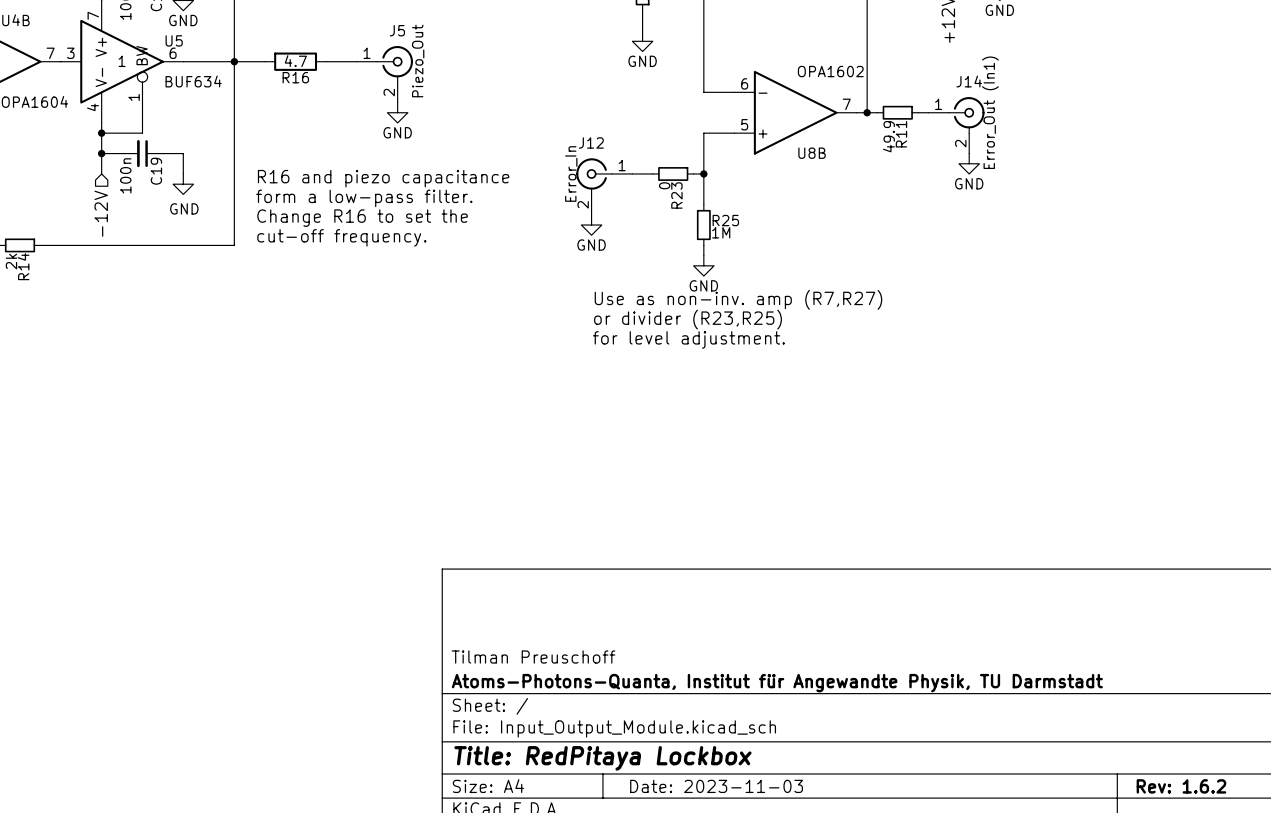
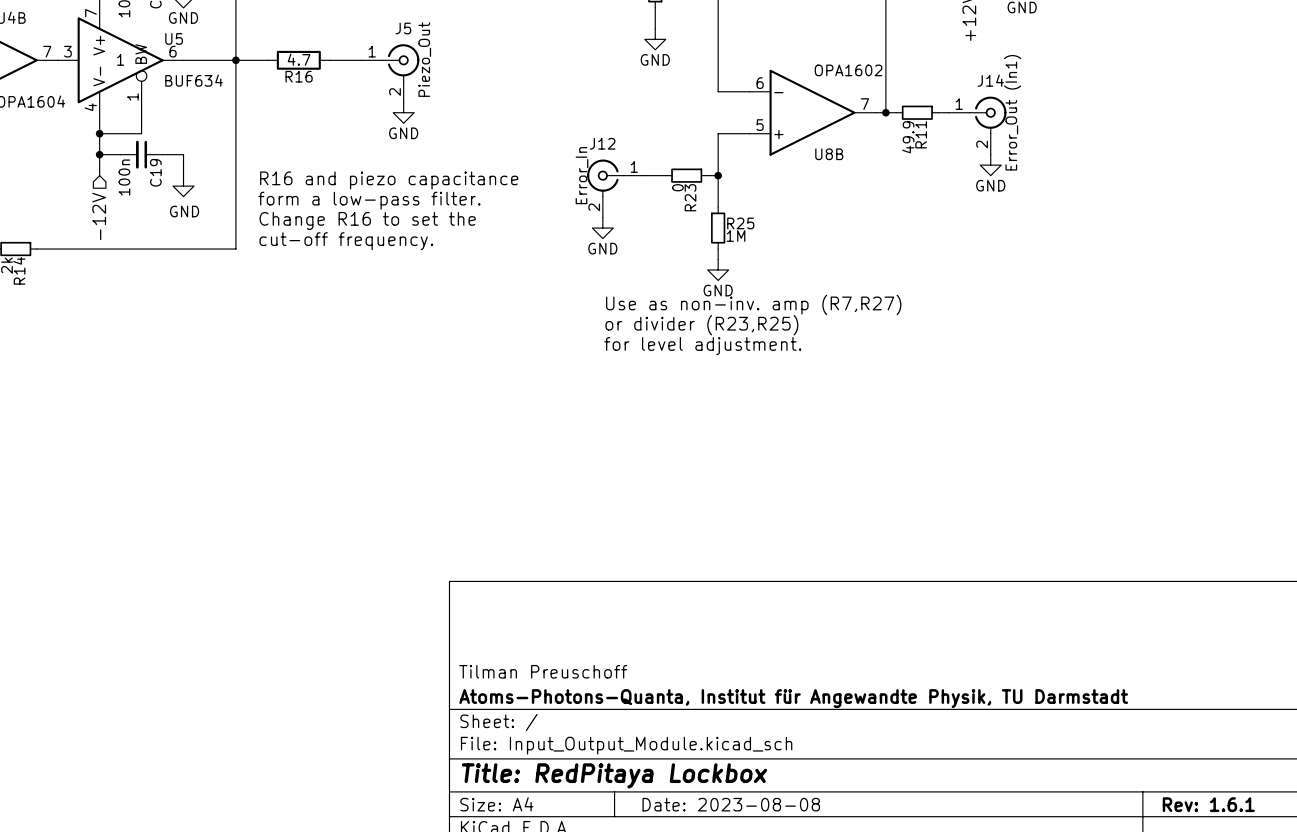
title block: Date: 2023-11-03 (716, 786) -> Date: 2023-08-08 (731, 804)
title block: Rev: 1.6.2 (1181, 786) -> Rev: 1.6.1 (1208, 804)

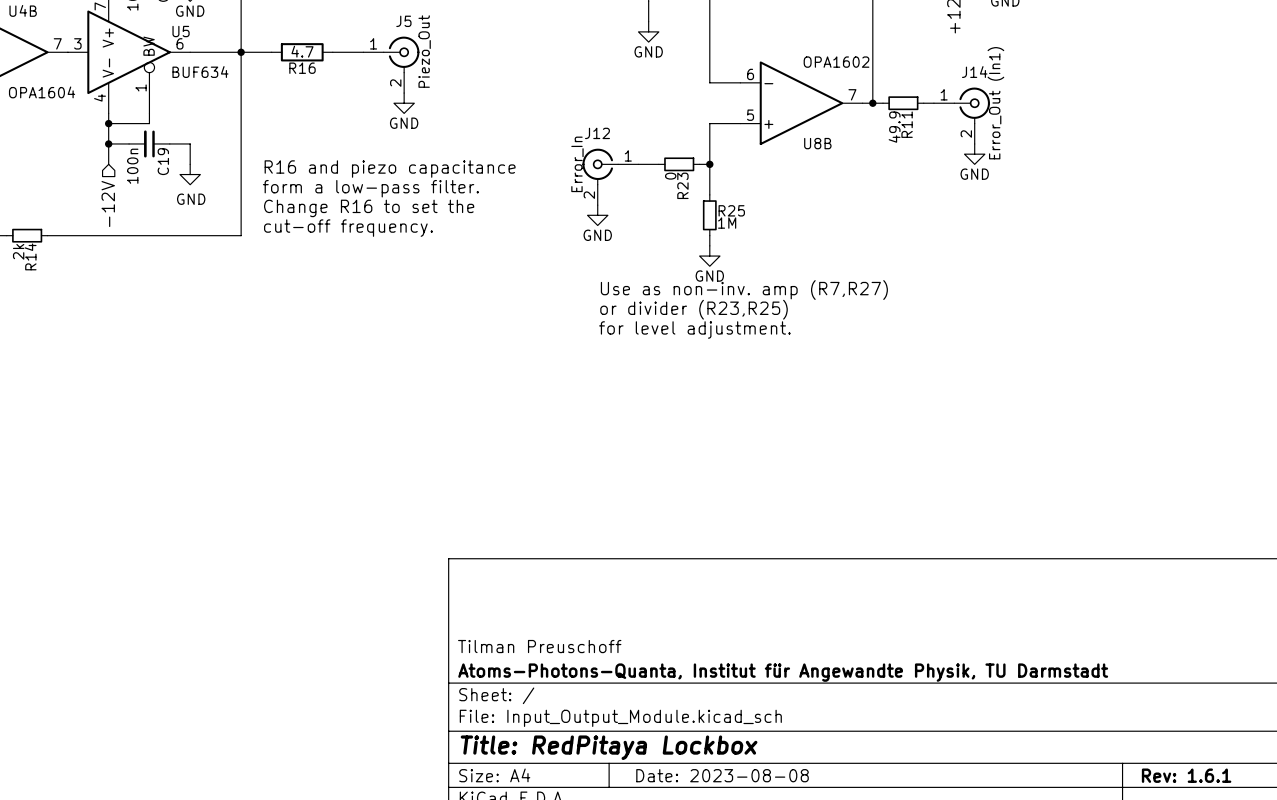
U5 text: 1 (120, 59) -> none

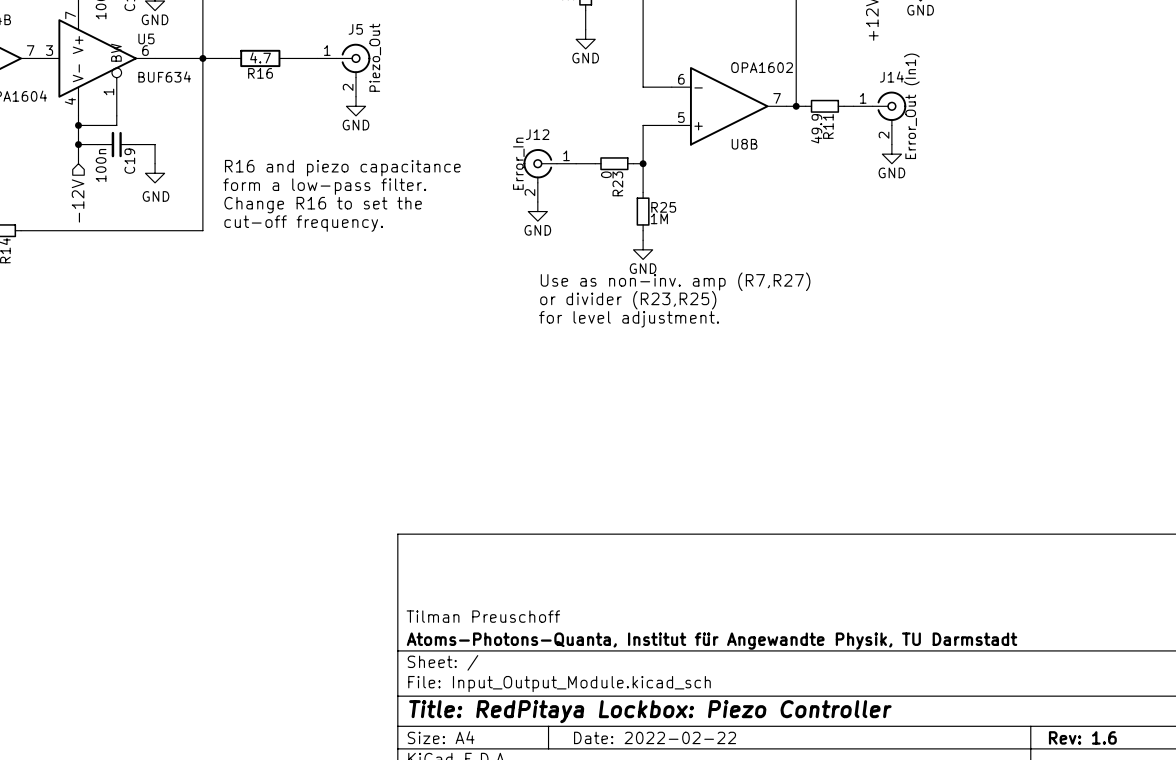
title block: Title: RedPitaya Lockbox (609, 747) -> Title: RedPitaya Lockbox: Piezo Controller (650, 711)
title block: Date: 2023-08-08 (722, 775) -> Date: 2022-02-22 (655, 737)
title block: Rev: 1.6.1 (1186, 775) -> Rev: 1.6 (1082, 737)

